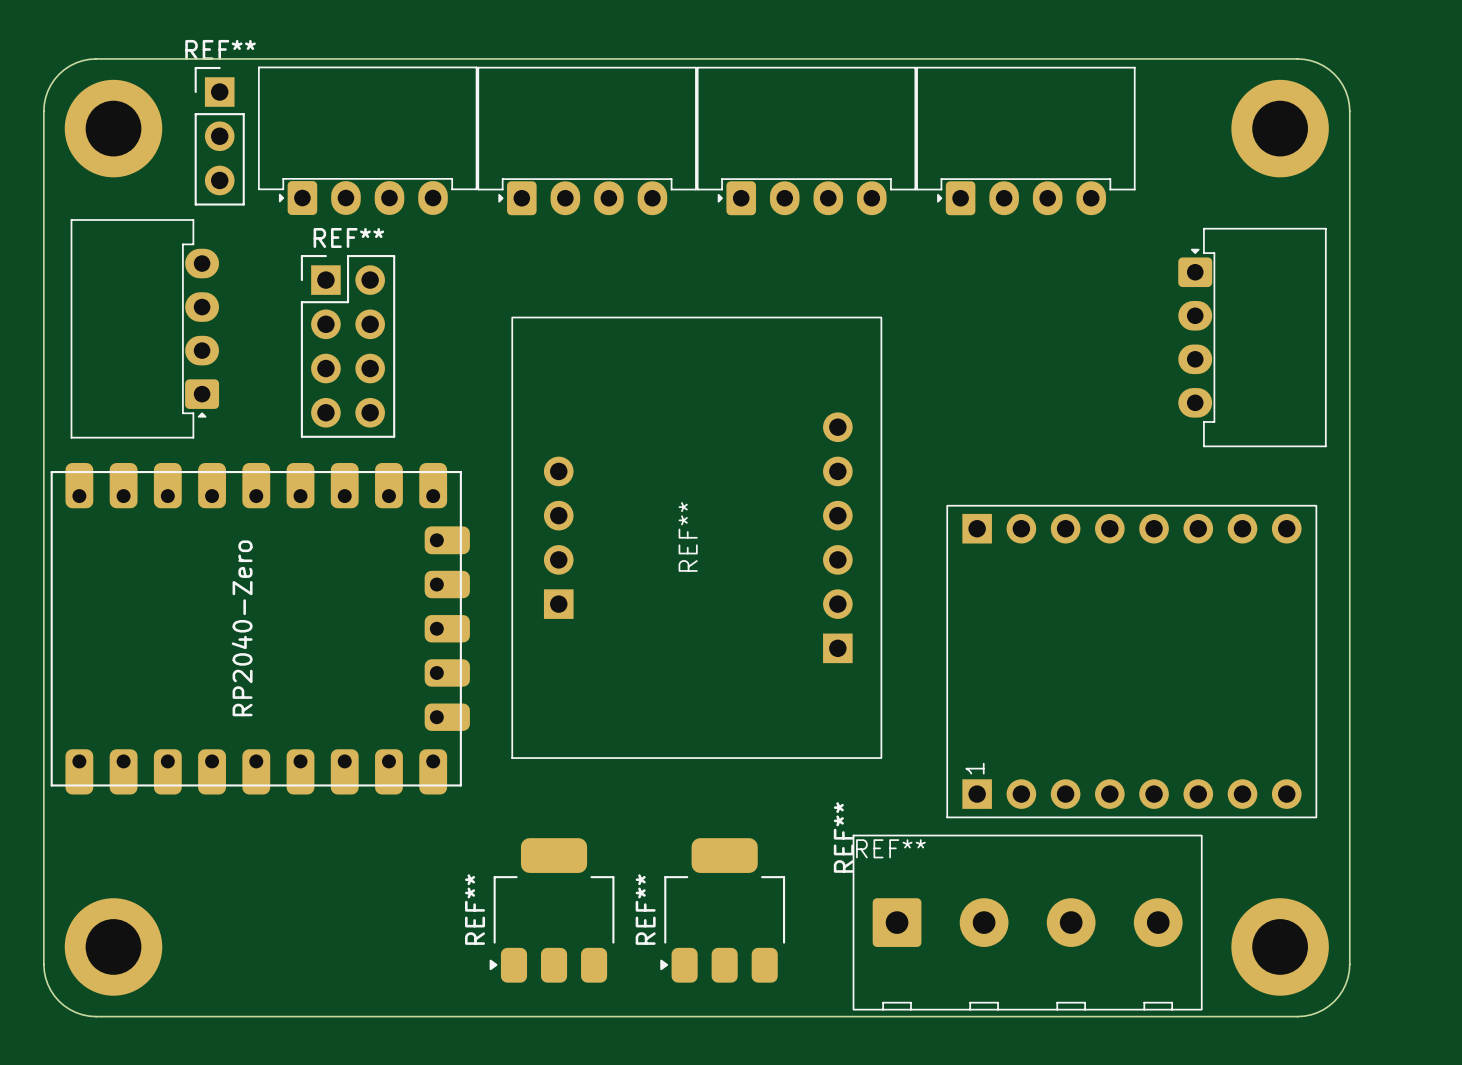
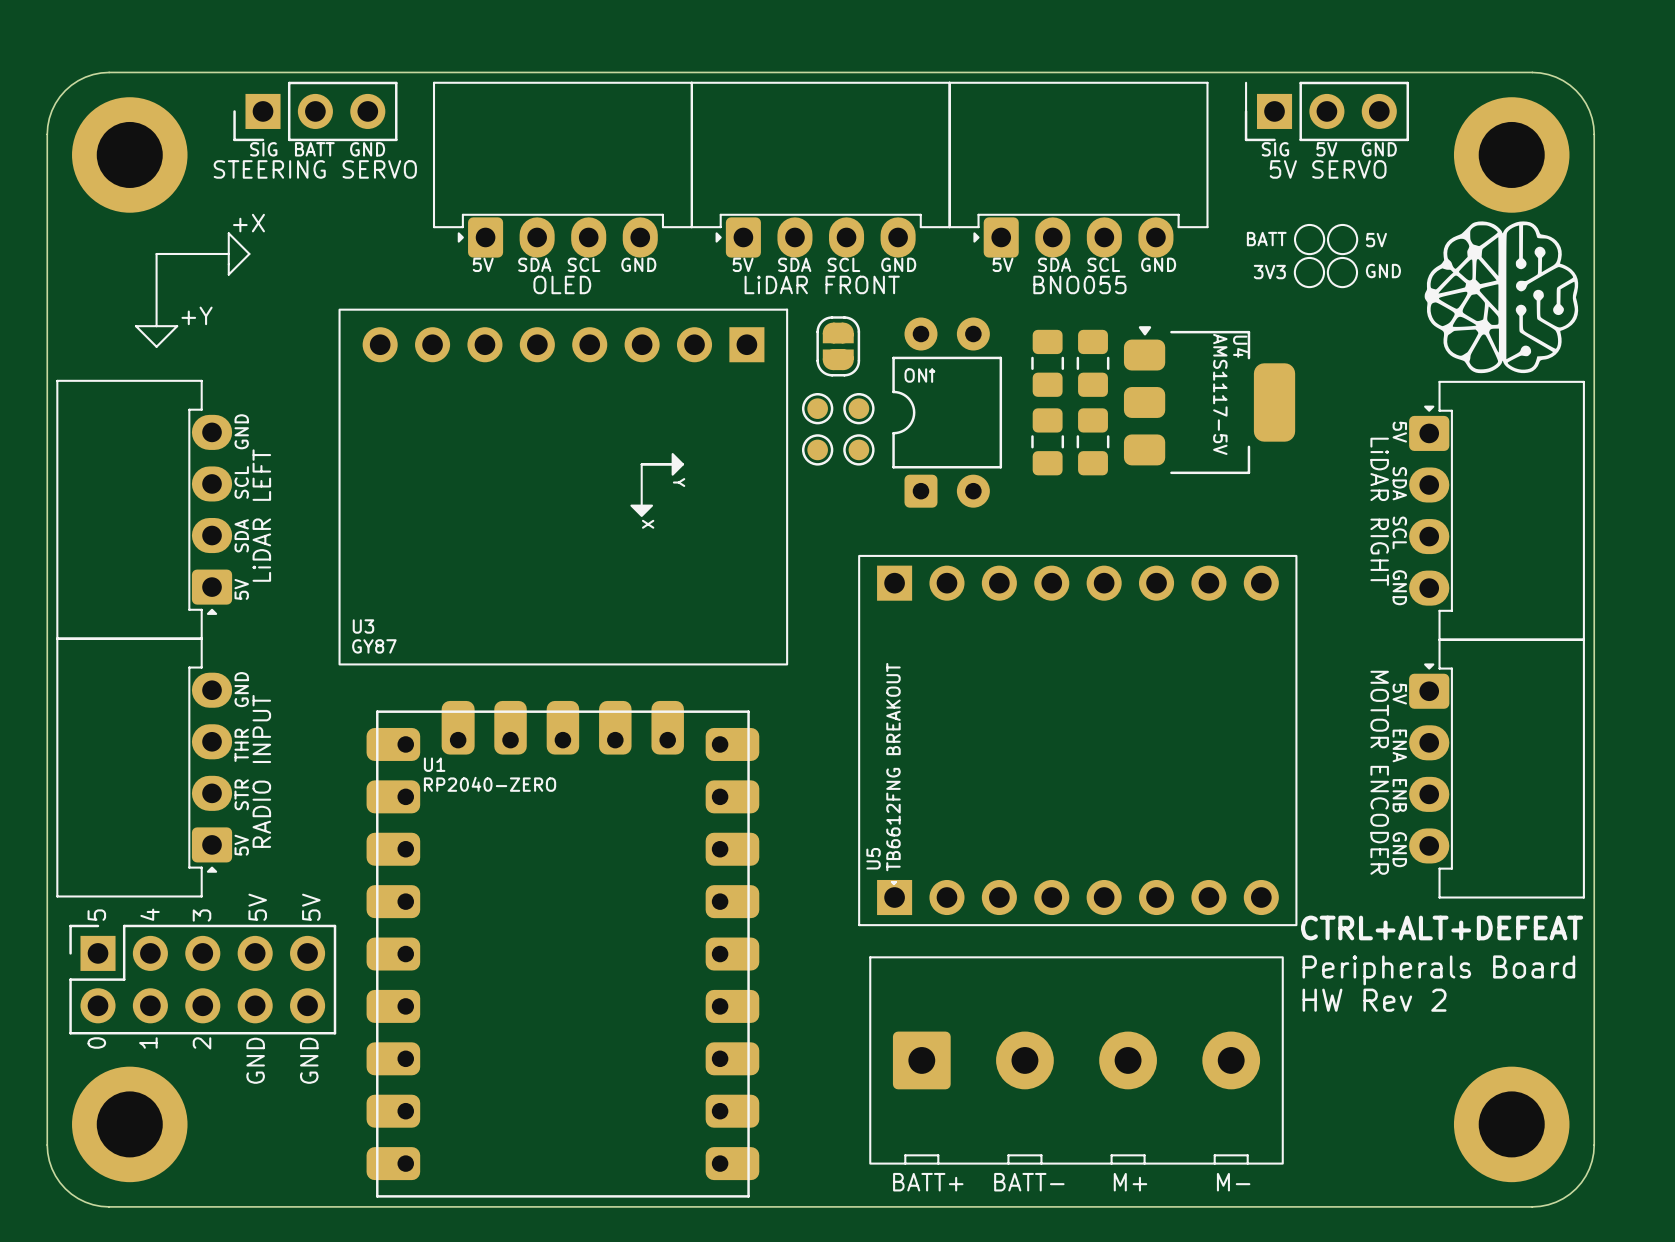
line: none -> (1246, 82) (1246, 111)
part: none -> (315, 111)
part: none -> (1326, 111)
text: none -> SIG (263, 149)
text: none -> BATT (314, 149)
text: none -> GND (367, 149)
text: none -> SIG (1275, 149)
text: none -> 5V (1326, 149)
text: none -> GND (1379, 149)
REF**: (219, 136) -> none
text: none -> STEERING SERVO (315, 169)
part: (367, 140) -> none
text: none -> 5V SERVO (1328, 169)
part: none -> (562, 169)
part: (587, 141) -> none
part: none -> (820, 169)
part: (806, 141) -> none
part: none -> (1078, 169)
part: (1025, 141) -> none
drawing: none -> [1424, 221, 1579, 374]
text: none -> +X (248, 223)
drawing: none -> [1293, 223, 1359, 289]
line: none -> (228, 233) (228, 274) (249, 253) (228, 233)
text: none -> BATT (1266, 239)
text: none -> 5V (1376, 240)
line: none -> (228, 253) (156, 253) (156, 326)
text: none -> 5V (483, 264)
text: none -> SDA (534, 264)
text: none -> SCL (584, 264)
text: none -> GND (638, 264)
text: none -> 5V (743, 264)
text: none -> SDA (794, 264)
text: none -> SCL (843, 264)
text: none -> GND (898, 264)
text: none -> 5V (1003, 264)
text: none -> SDA (1054, 264)
text: none -> SCL (1103, 264)
text: none -> GND (1158, 264)
text: none -> GND (1383, 271)
text: none -> 3V3 (1269, 272)
text: none -> OLED (562, 284)
text: none -> LiDAR FRONT (822, 284)
text: none -> BNO055 (1079, 284)
text: none -> +Y (197, 315)
line: none -> (135, 326) (177, 326) (156, 346) (135, 326)
part: none -> (838, 346)
text: none -> U4 (1240, 346)
part: none -> (1047, 363)
part: none -> (1093, 363)
line: none -> (932, 369) (934, 371) (930, 371) (932, 369)
line: none -> (932, 371) (932, 381)
text: none -> ON (915, 375)
part position: (144, 328) -> (144, 509)
text: none -> AMS1117-5V (1220, 394)
part: none -> (1209, 400)
part position: (1252, 337) -> (1497, 510)
part: none -> (817, 408)
part: none -> (858, 408)
REF**: (348, 346) -> none
part: none -> (947, 412)
text: none -> GND (241, 431)
text: none -> 5V (1399, 432)
part: none -> (1047, 441)
part: none -> (1093, 441)
part: none -> (817, 449)
part: none -> (858, 449)
text: none -> SCL (241, 482)
text: none -> SDA (1399, 483)
part: none -> (563, 487)
text: none -> LiDAR RIGHT (1379, 511)
text: none -> LiDAR LEFT (261, 515)
text: none -> SCL (1399, 532)
text: none -> SDA (241, 535)
text: none -> GND (1399, 587)
text: none -> 5V (241, 589)
text: none -> U3 (363, 626)
REF**: (696, 537) -> none
text: none -> GY87 (374, 646)
text: none -> GND (241, 689)
text: none -> 5V (1399, 694)
part: none -> (1077, 740)
text: none -> THR (241, 745)
text: none -> ENA (1399, 745)
part: RP2040-Zero (260, 628) -> none
text: none -> U1 (434, 764)
part: none -> (144, 767)
text: none -> TB6612FNG BREAKOUT (893, 767)
part: none -> (1497, 768)
text: none -> RADIO INPUT (261, 771)
text: none -> MOTOR ENCODER (1379, 772)
text: none -> RP2040-ZERO (490, 784)
REF**: (1131, 661) -> none
text: none -> STR (241, 794)
text: none -> ENB (1399, 795)
text: none -> 5V (241, 845)
text: none -> GND (1399, 849)
text: none -> U5 (873, 858)
line: none -> (891, 882) (896, 882) (893, 884) (891, 882)
text: none -> 5V (257, 907)
text: none -> 5V (311, 907)
text: none -> 4 (150, 914)
text: none -> 5 (96, 915)
text: none -> 3 (202, 915)
text: none -> CTRL+ALT+DEFEAT (1442, 927)
part: none -> (562, 949)
text: none -> Peripherals Board (1438, 970)
part: none -> (202, 979)
text: none -> HW Rev 2 (1374, 1000)
text: none -> 0 (96, 1042)
text: none -> 1 (148, 1042)
text: none -> 2 (202, 1043)
part: none -> (1076, 1060)
text: none -> GND (255, 1060)
text: none -> GND (309, 1060)
REF**: (552, 910) -> none
REF**: (722, 910) -> none
REF**: (1027, 922) -> none
text: none -> BATT+ (928, 1182)
text: none -> BATT- (1029, 1182)
text: none -> M+ (1130, 1182)
text: none -> M- (1233, 1182)

